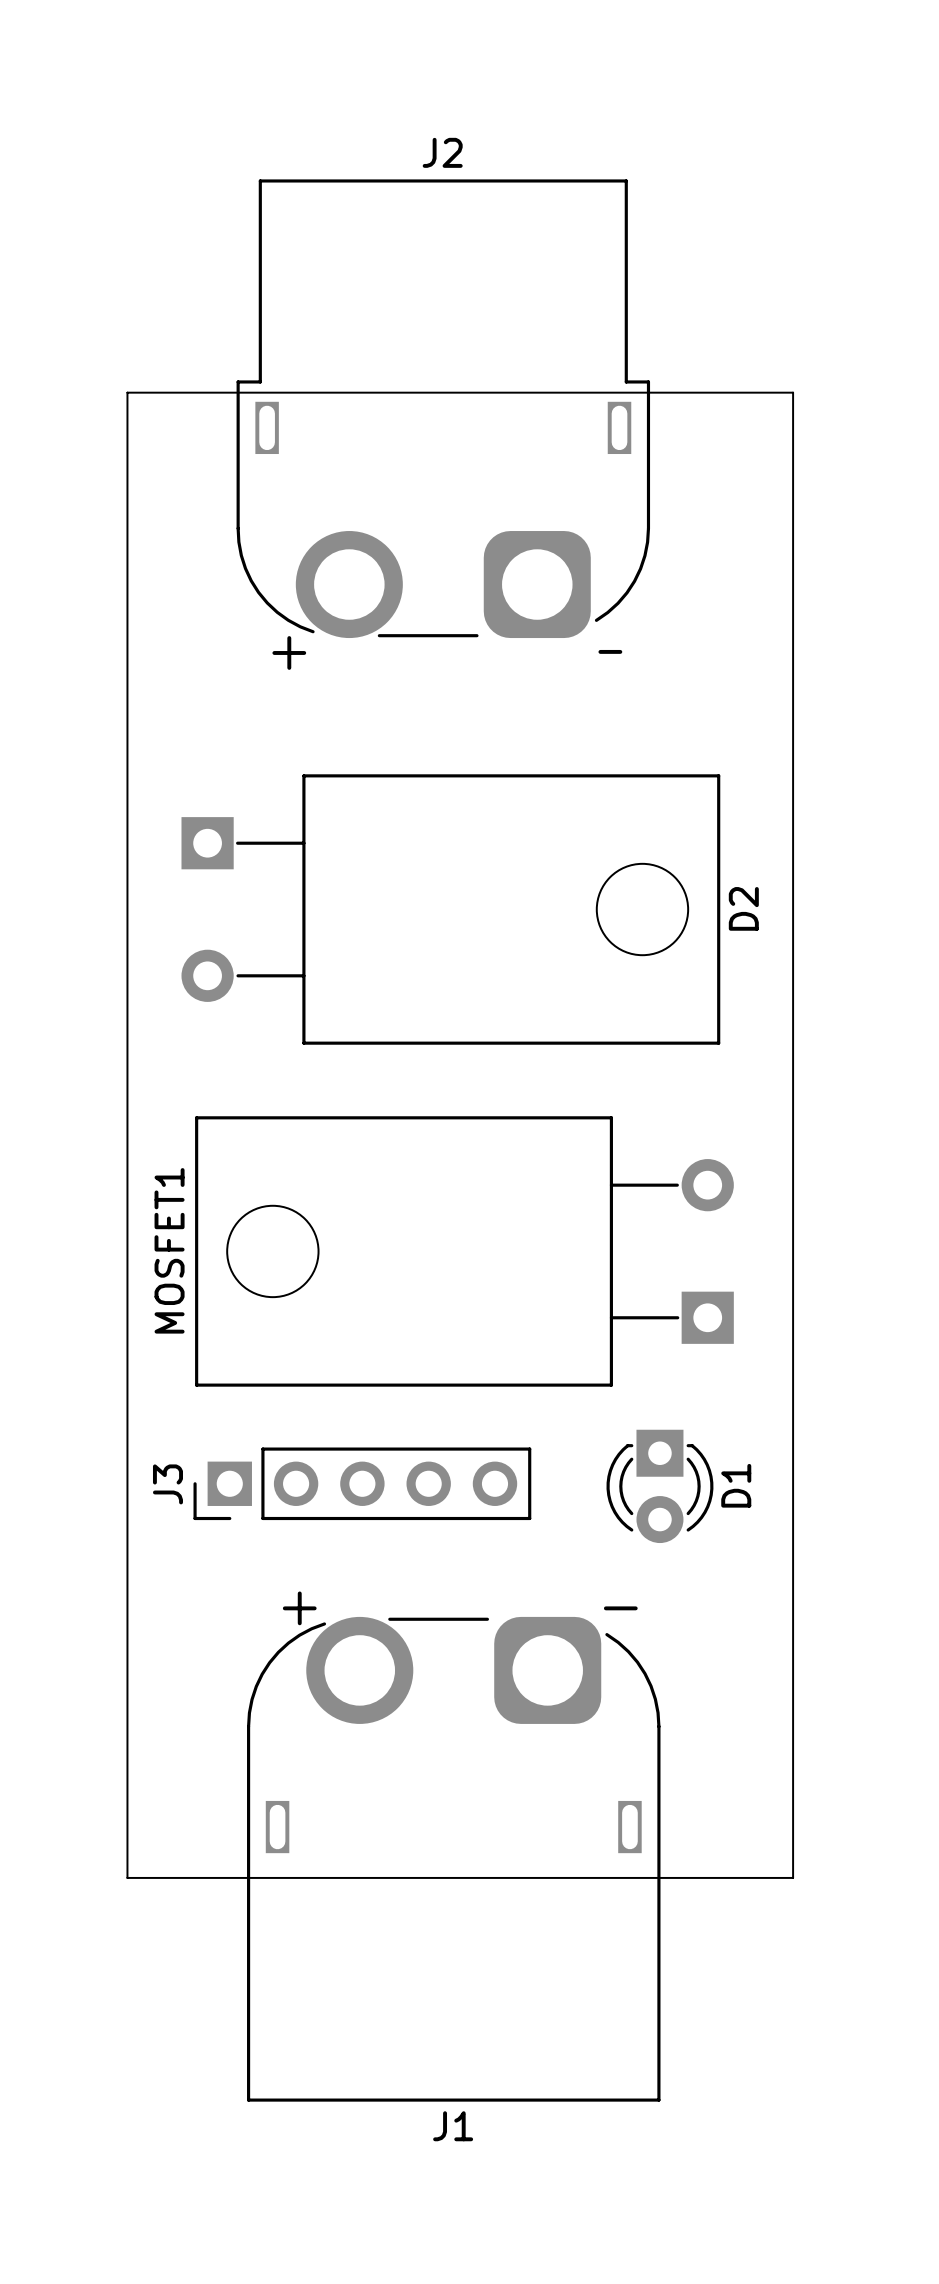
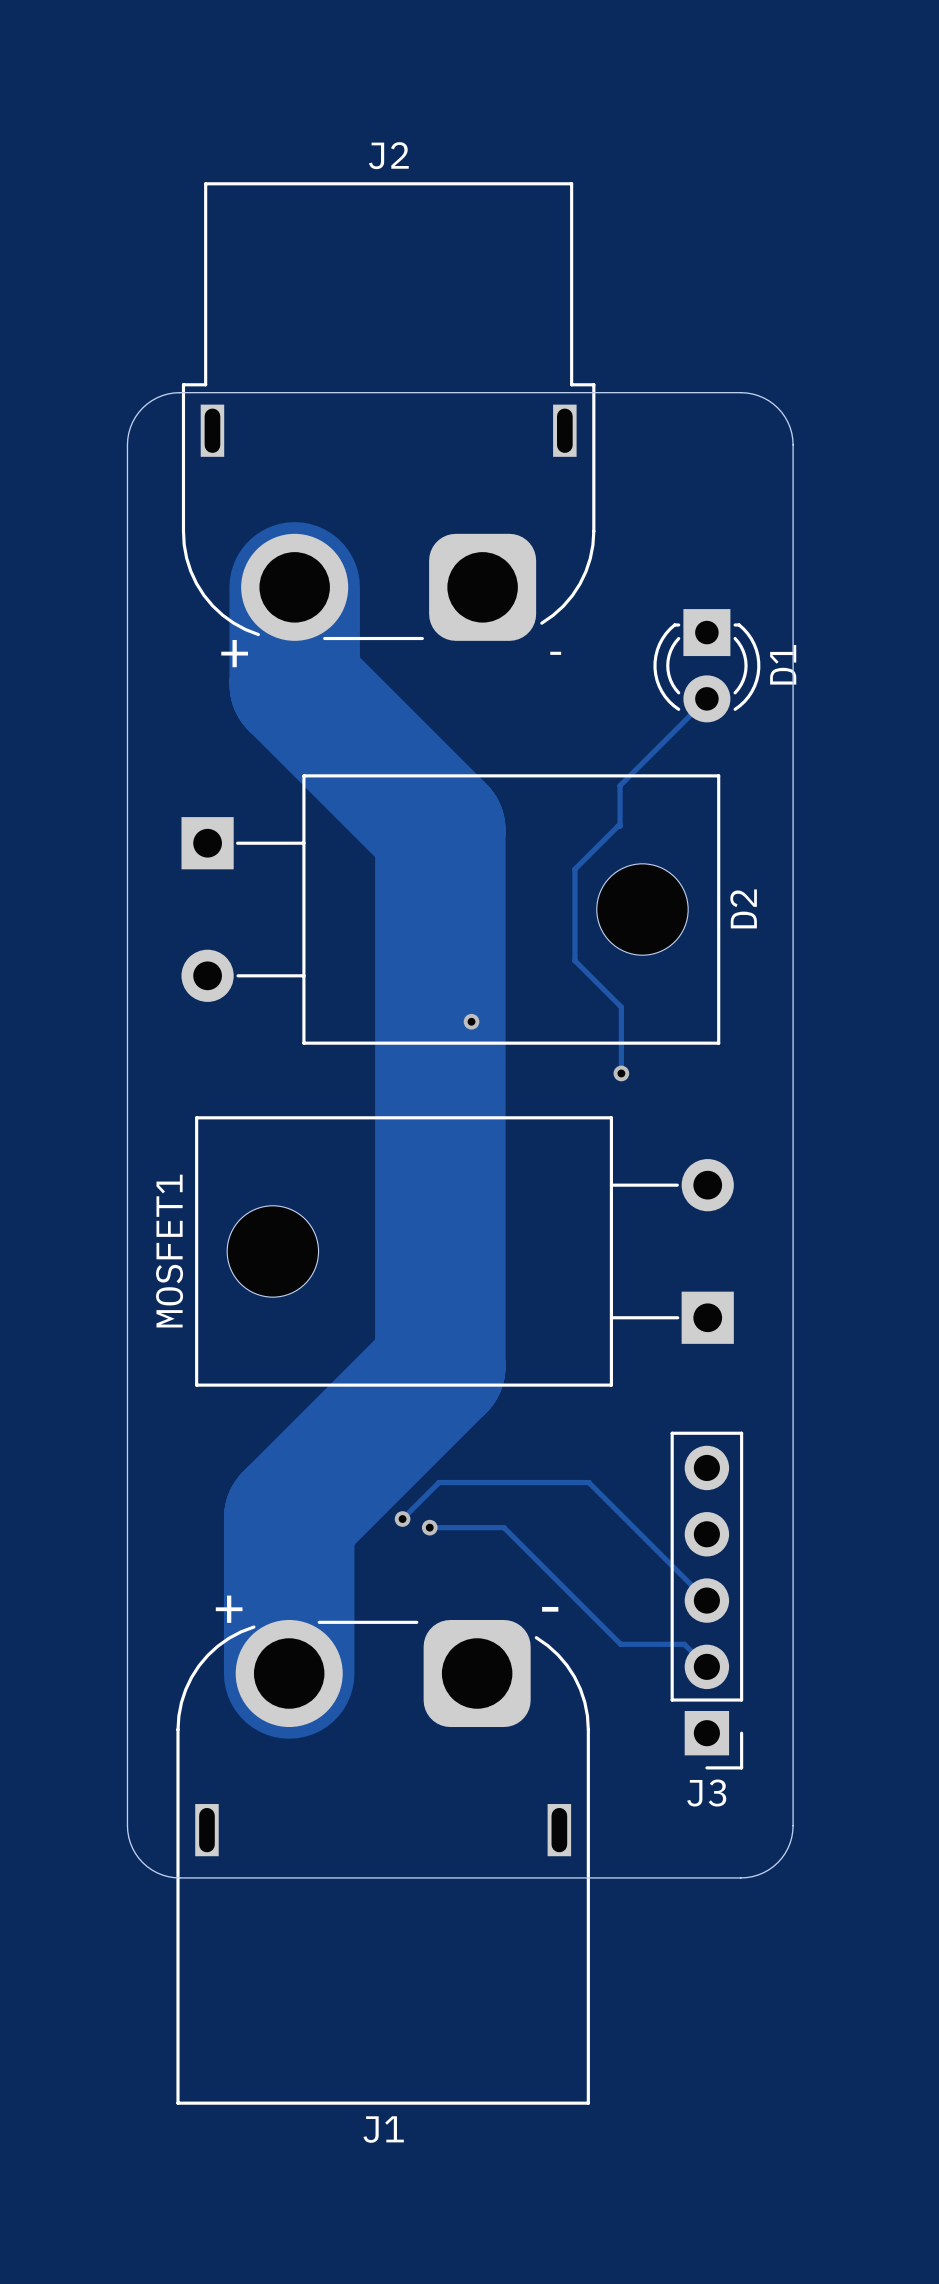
board edge: (179, 392) (127, 392) (127, 444) -> (179, 392) (162, 395) (142, 407) (130, 427) (127, 444)
board edge: (740, 392) (793, 392) (793, 444) -> (740, 392) (763, 397) (777, 407) (787, 422) (793, 444)
J2 position: (443, 408) -> (388, 411)
track: none -> (294, 587) (294, 684) (440, 830) (440, 1366) (289, 1517) (289, 1673)
track: none -> (706, 698) (620, 785) (620, 826) (574, 869) (574, 960) (621, 1007) (621, 1073)
via: none -> (471, 1021)
via: none -> (621, 1073)
J3 rotation: 0° (362, 1483) -> 90° counterclockwise (706, 1600)
J3 position: (362, 1483) -> (706, 1600)
D1 position: (659, 1486) -> (706, 665)
track: none -> (402, 1519) (439, 1482) (588, 1482) (706, 1600)
via: none -> (402, 1519)
track: none -> (429, 1527) (504, 1527) (620, 1644) (684, 1644) (706, 1666)
via: none -> (429, 1527)
board edge: (127, 1825) (127, 1877) (179, 1877) -> (127, 1825) (132, 1848) (142, 1862) (162, 1875) (179, 1877)
board edge: (793, 1825) (793, 1877) (740, 1877) -> (793, 1825) (787, 1848) (777, 1862) (758, 1875) (740, 1877)
J1 position: (453, 1859) -> (383, 1862)

